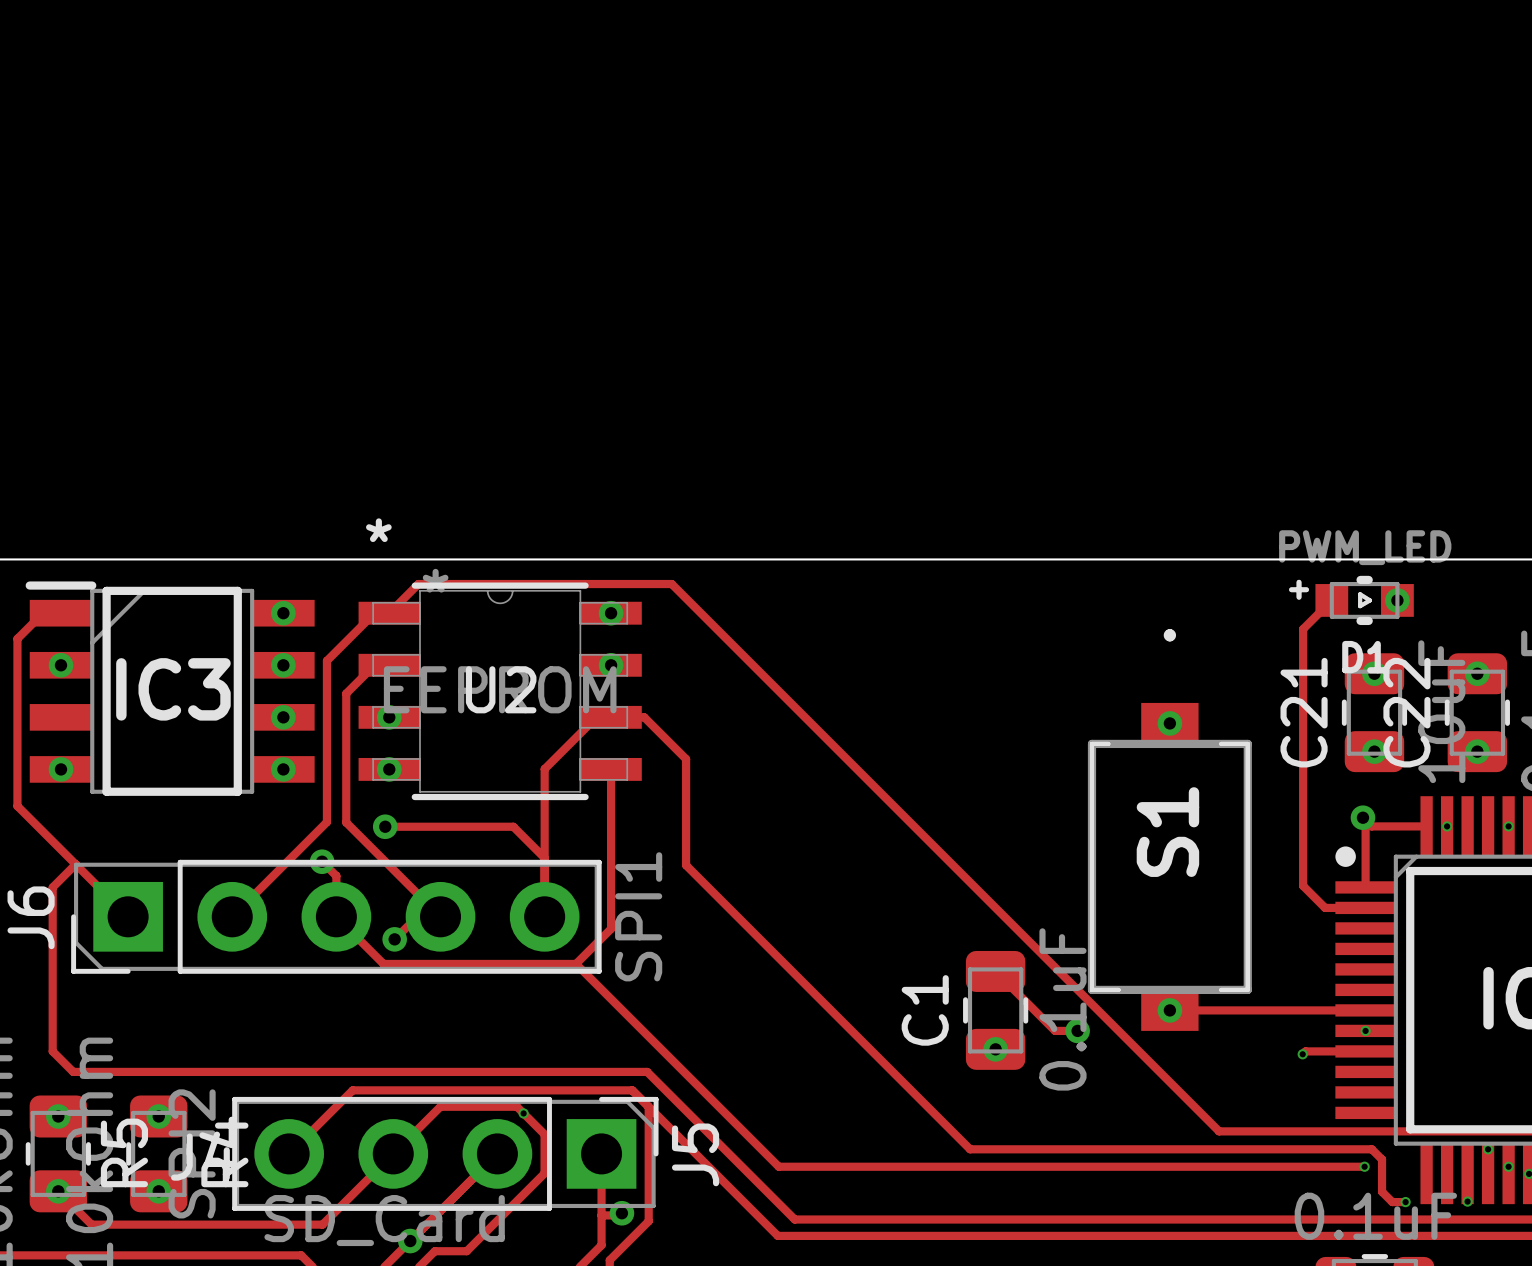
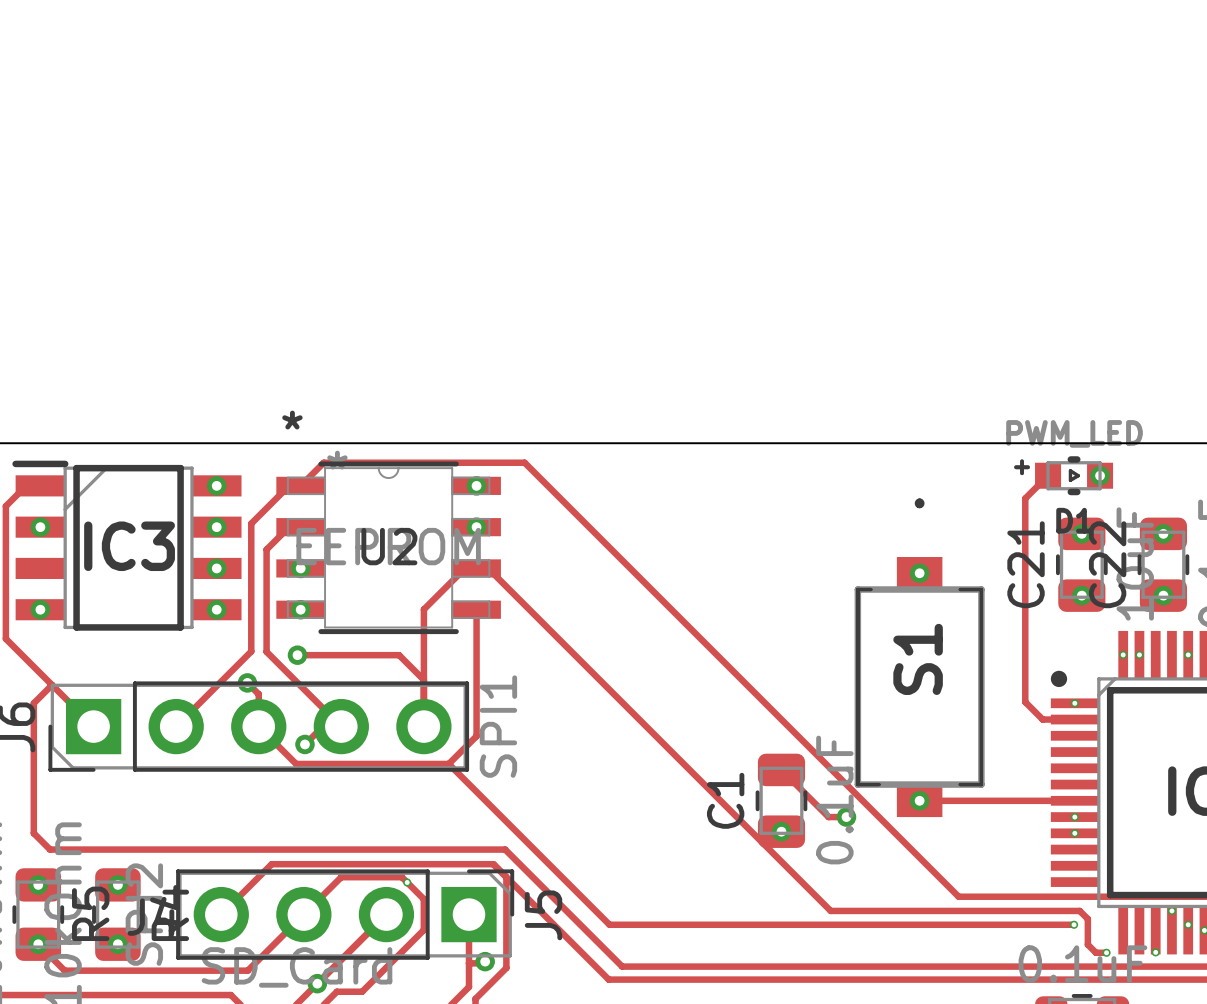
track: (625, 717) (644, 717) (686, 759) (686, 865) (970, 1149) (1057, 1149) -> (488, 568) (830, 910)
track: (1362, 817) (1371, 826) (1426, 826) -> none
via: (1362, 817) -> none
track: (1365, 820) (1365, 887) -> none
via: none -> (1123, 654)
via: none -> (1074, 703)
track: (1365, 1051) (1305, 1051) (1302, 1054) -> none
via position: (1302, 1054) -> (1074, 833)

